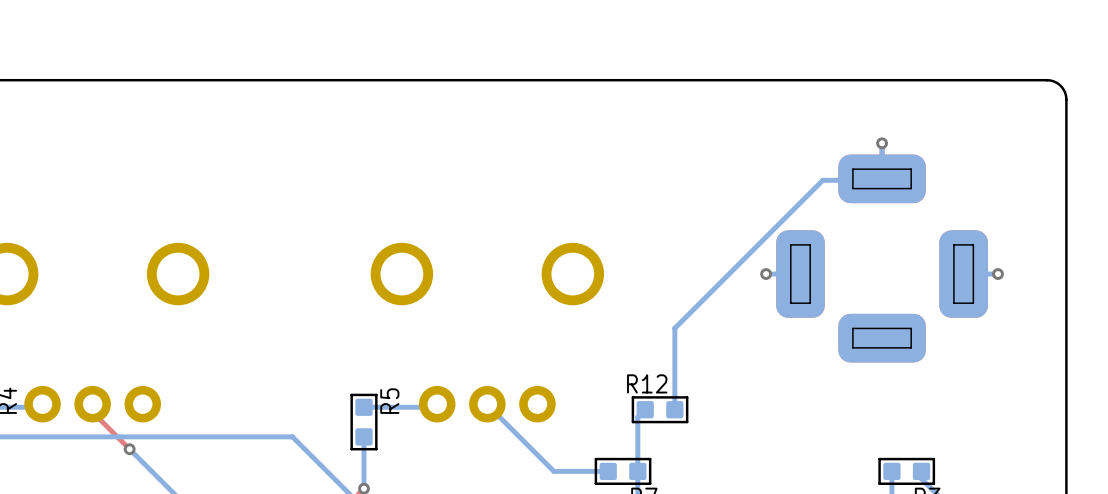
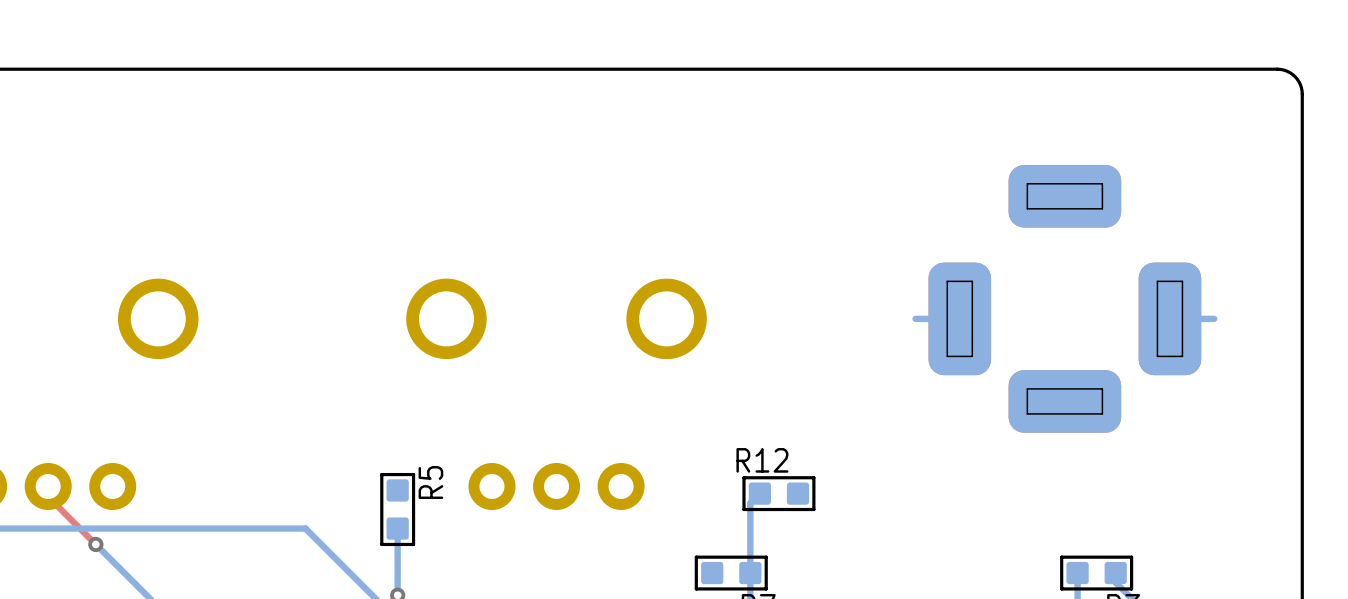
bottom track: (882, 143) (882, 180) (822, 180) (674, 328) (674, 409) -> none
via: (882, 143) -> none
via: (766, 274) -> none
via: (998, 274) -> none
bottom track: (437, 404) (433, 407) (364, 407) -> none
bottom track: (487, 404) (553, 471) (608, 471) -> none

